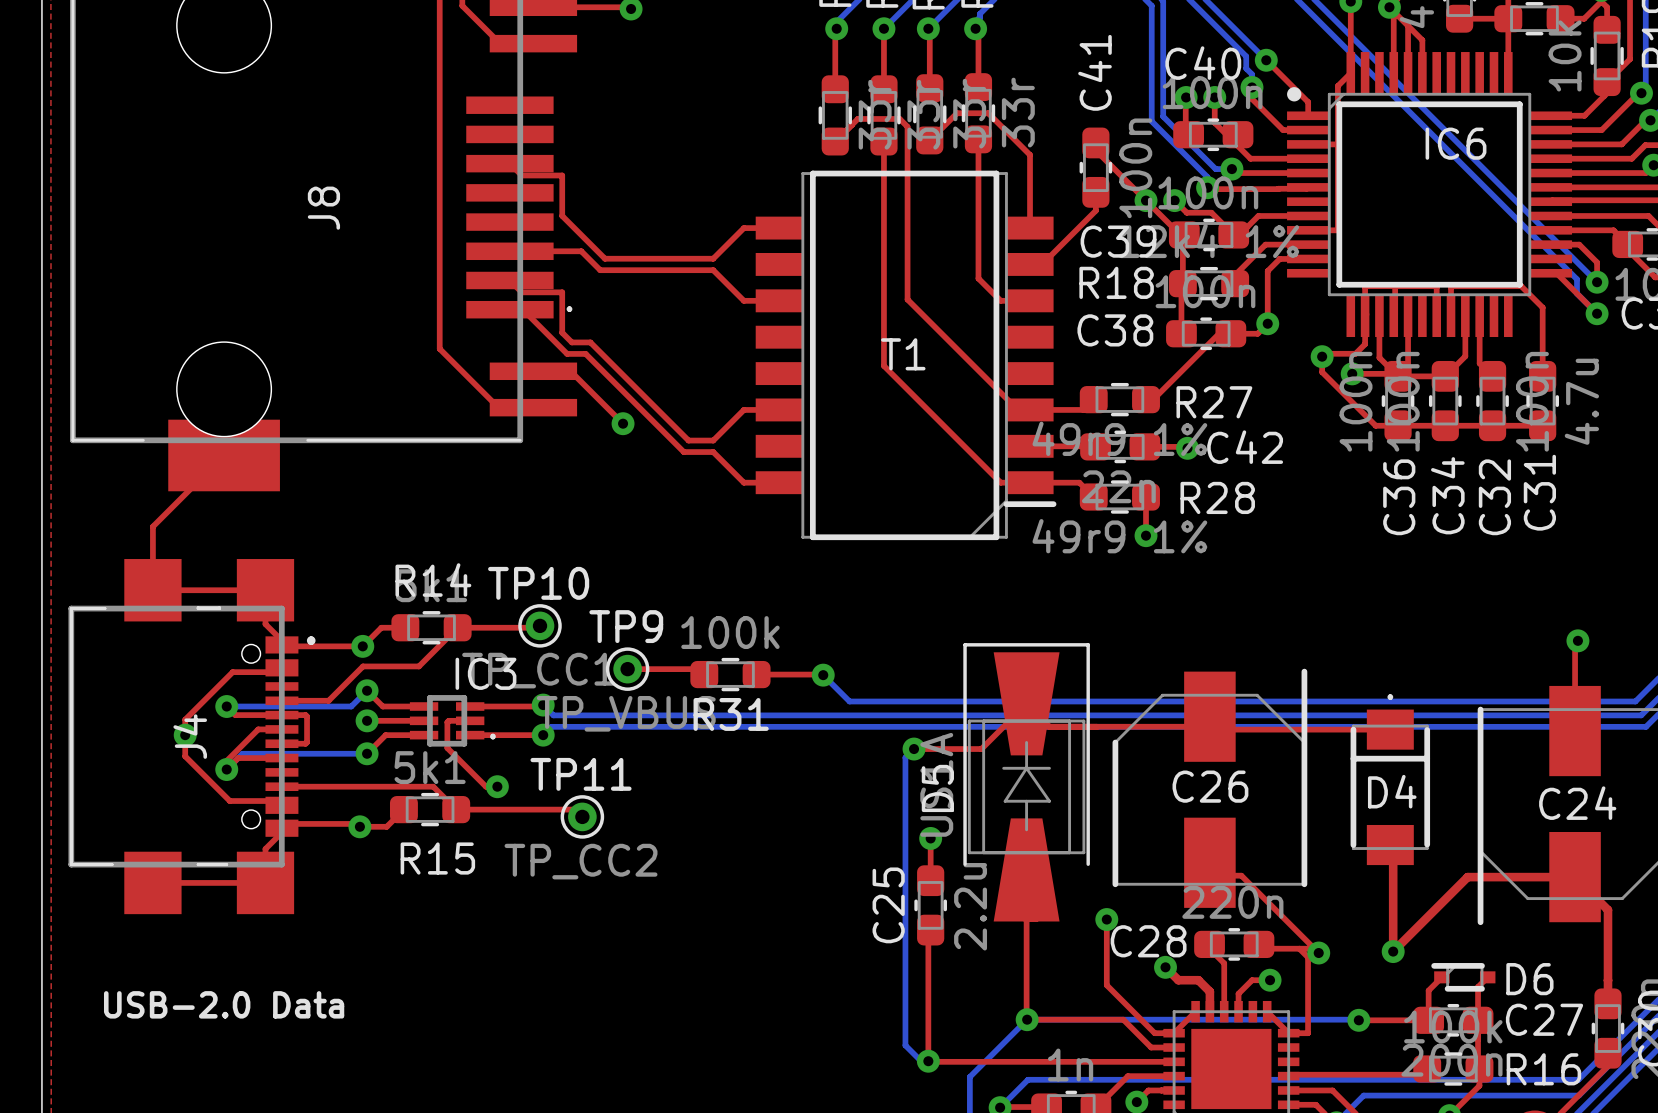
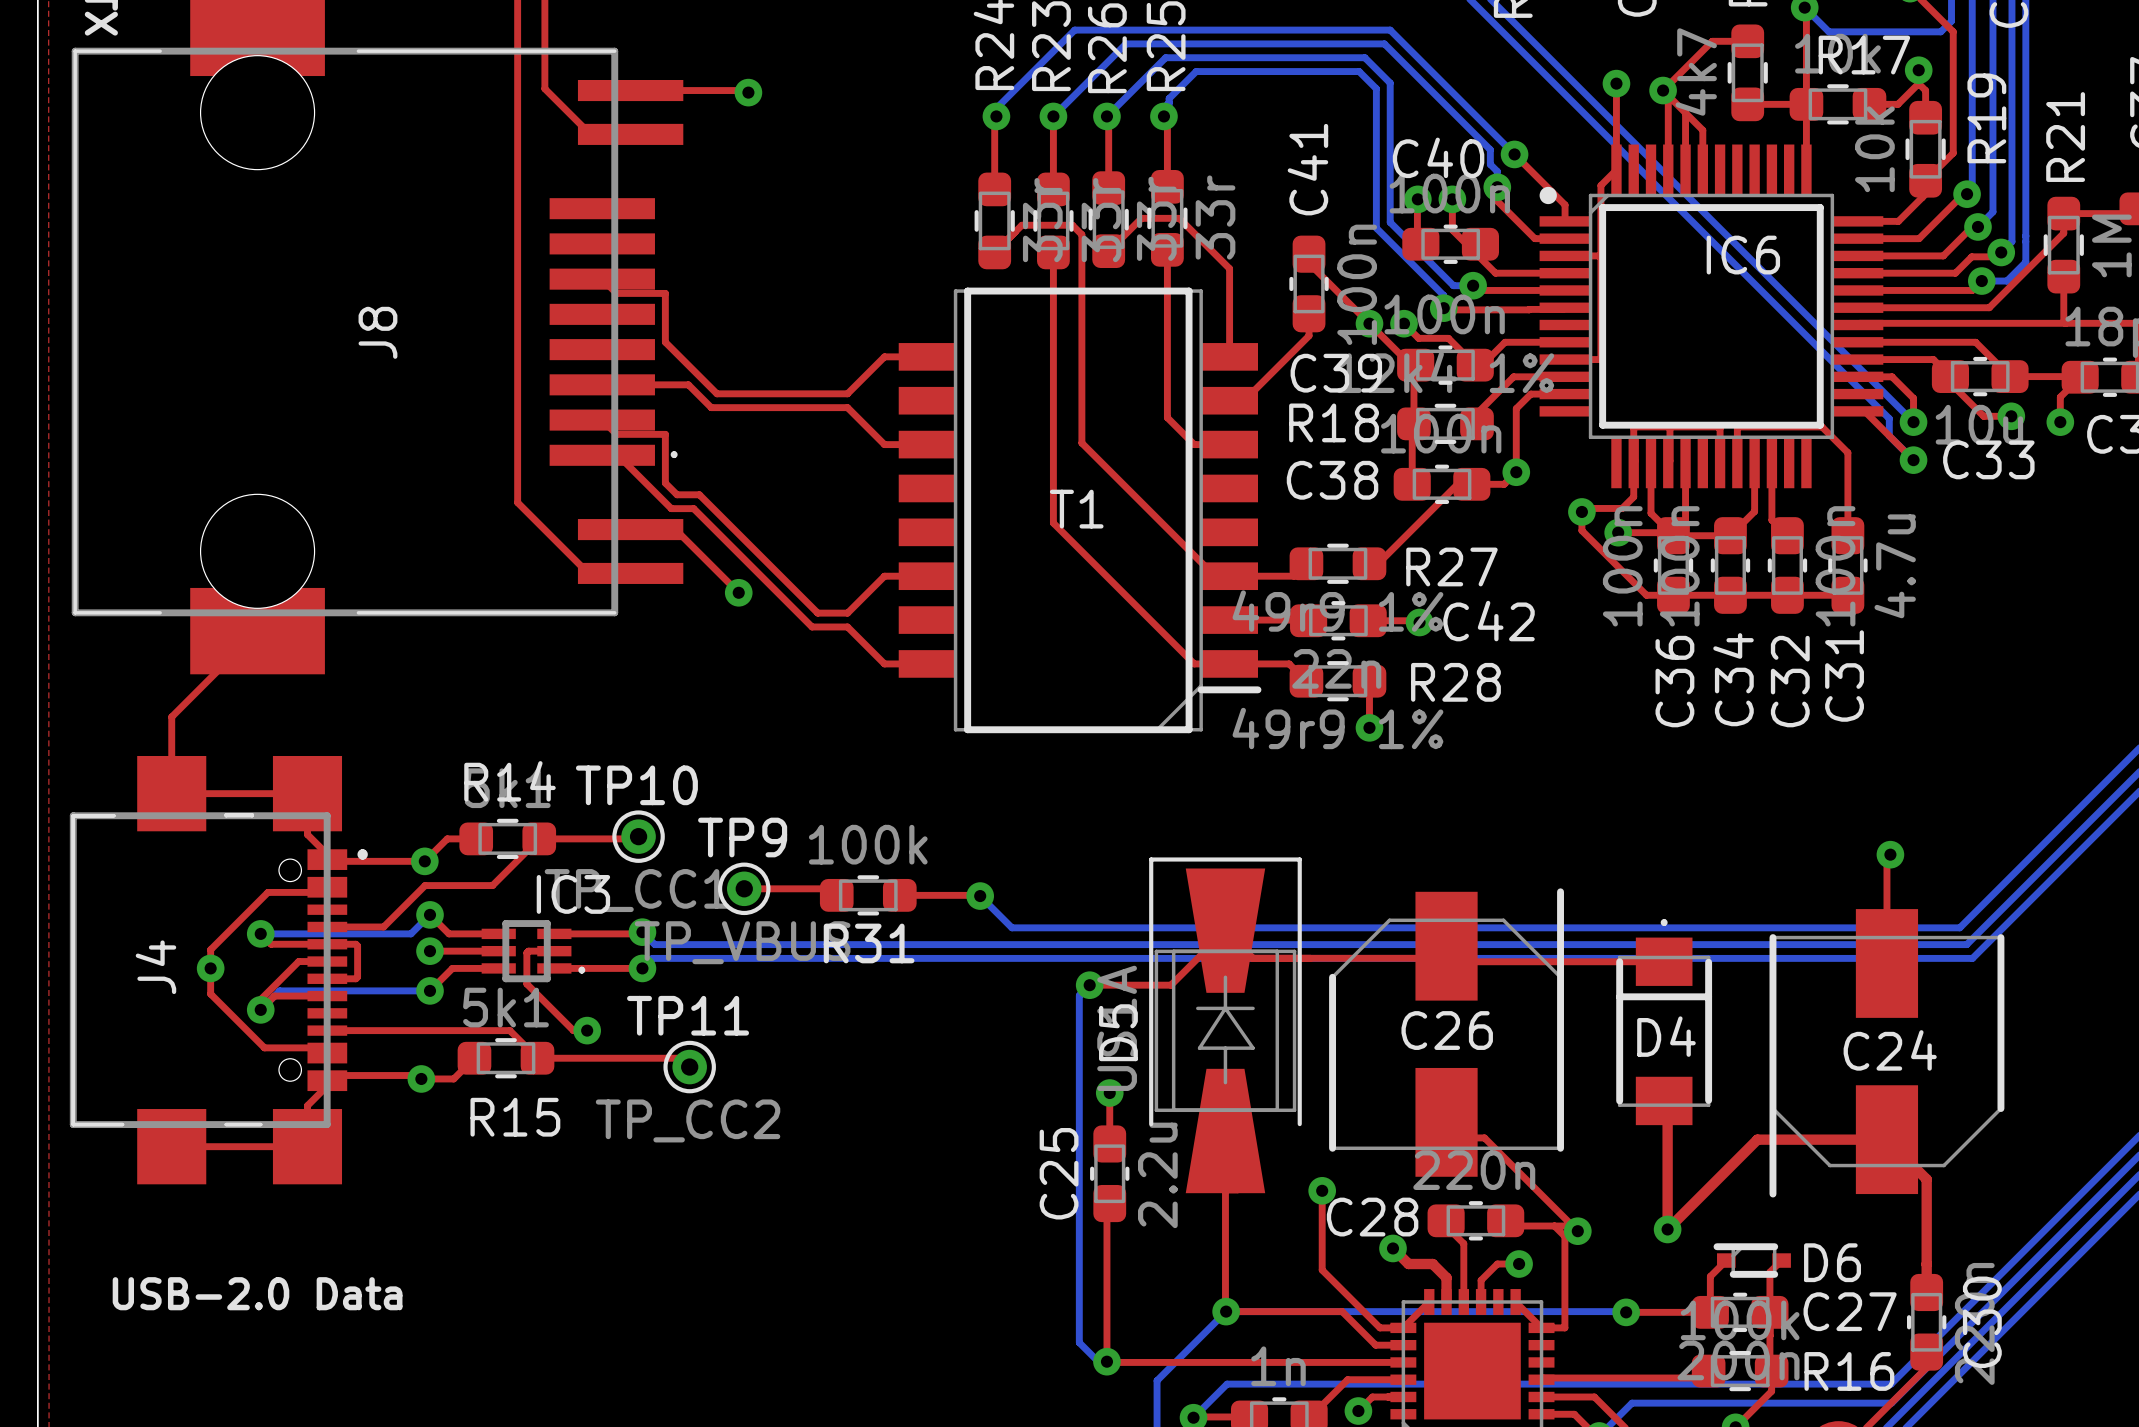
J4 name position: J4 (190, 736) -> J4 (155, 967)

